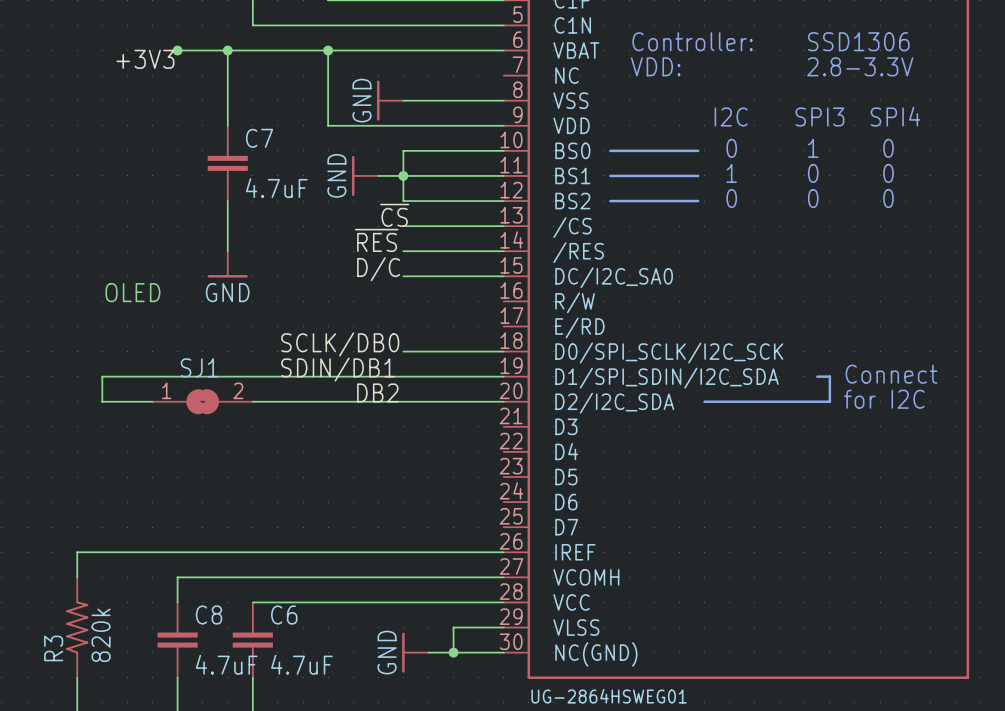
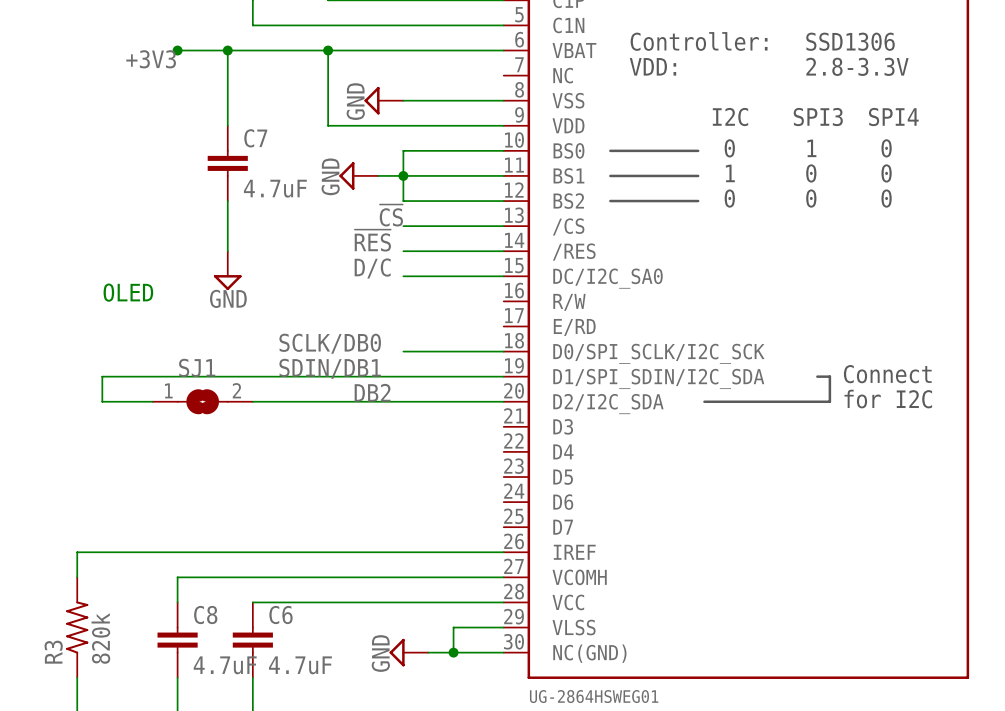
power symbol shape: [377, 80, 404, 121] -> [364, 86, 404, 115]
power symbol shape: [351, 155, 379, 197] -> [339, 162, 379, 190]
power symbol shape: [207, 251, 248, 278] -> [213, 251, 242, 291]
power symbol shape: [402, 632, 429, 673] -> [389, 638, 429, 667]

